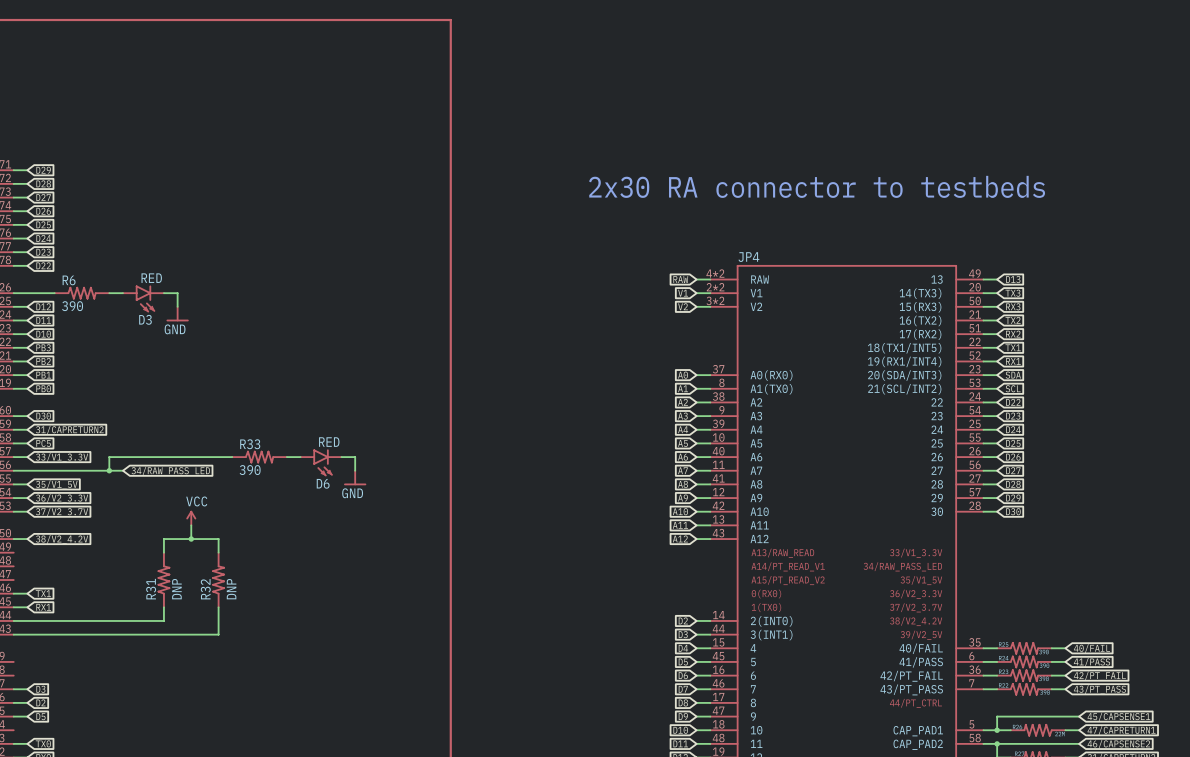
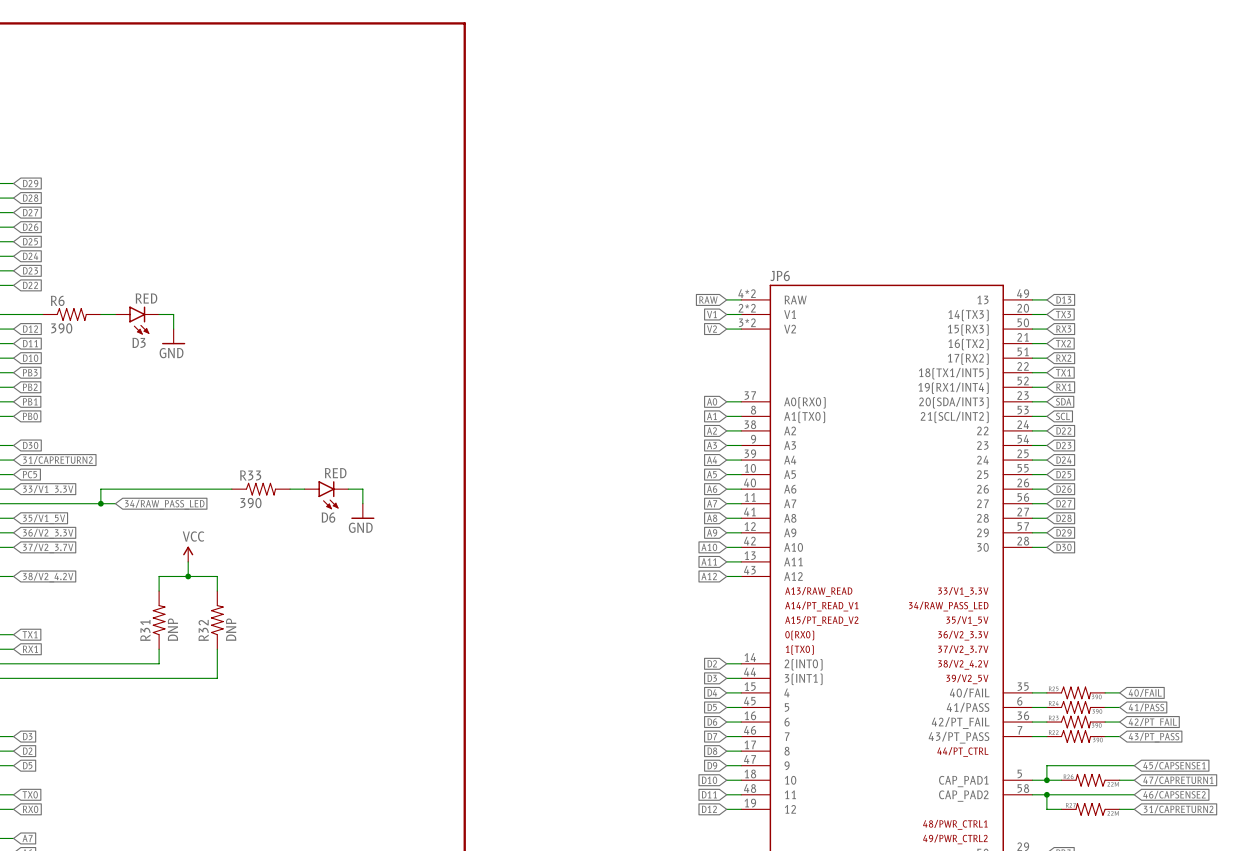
text: 2x30 RA connector to testbeds (817, 186) -> none
JP4 name: JP4 (748, 257) -> JP6 (780, 275)

